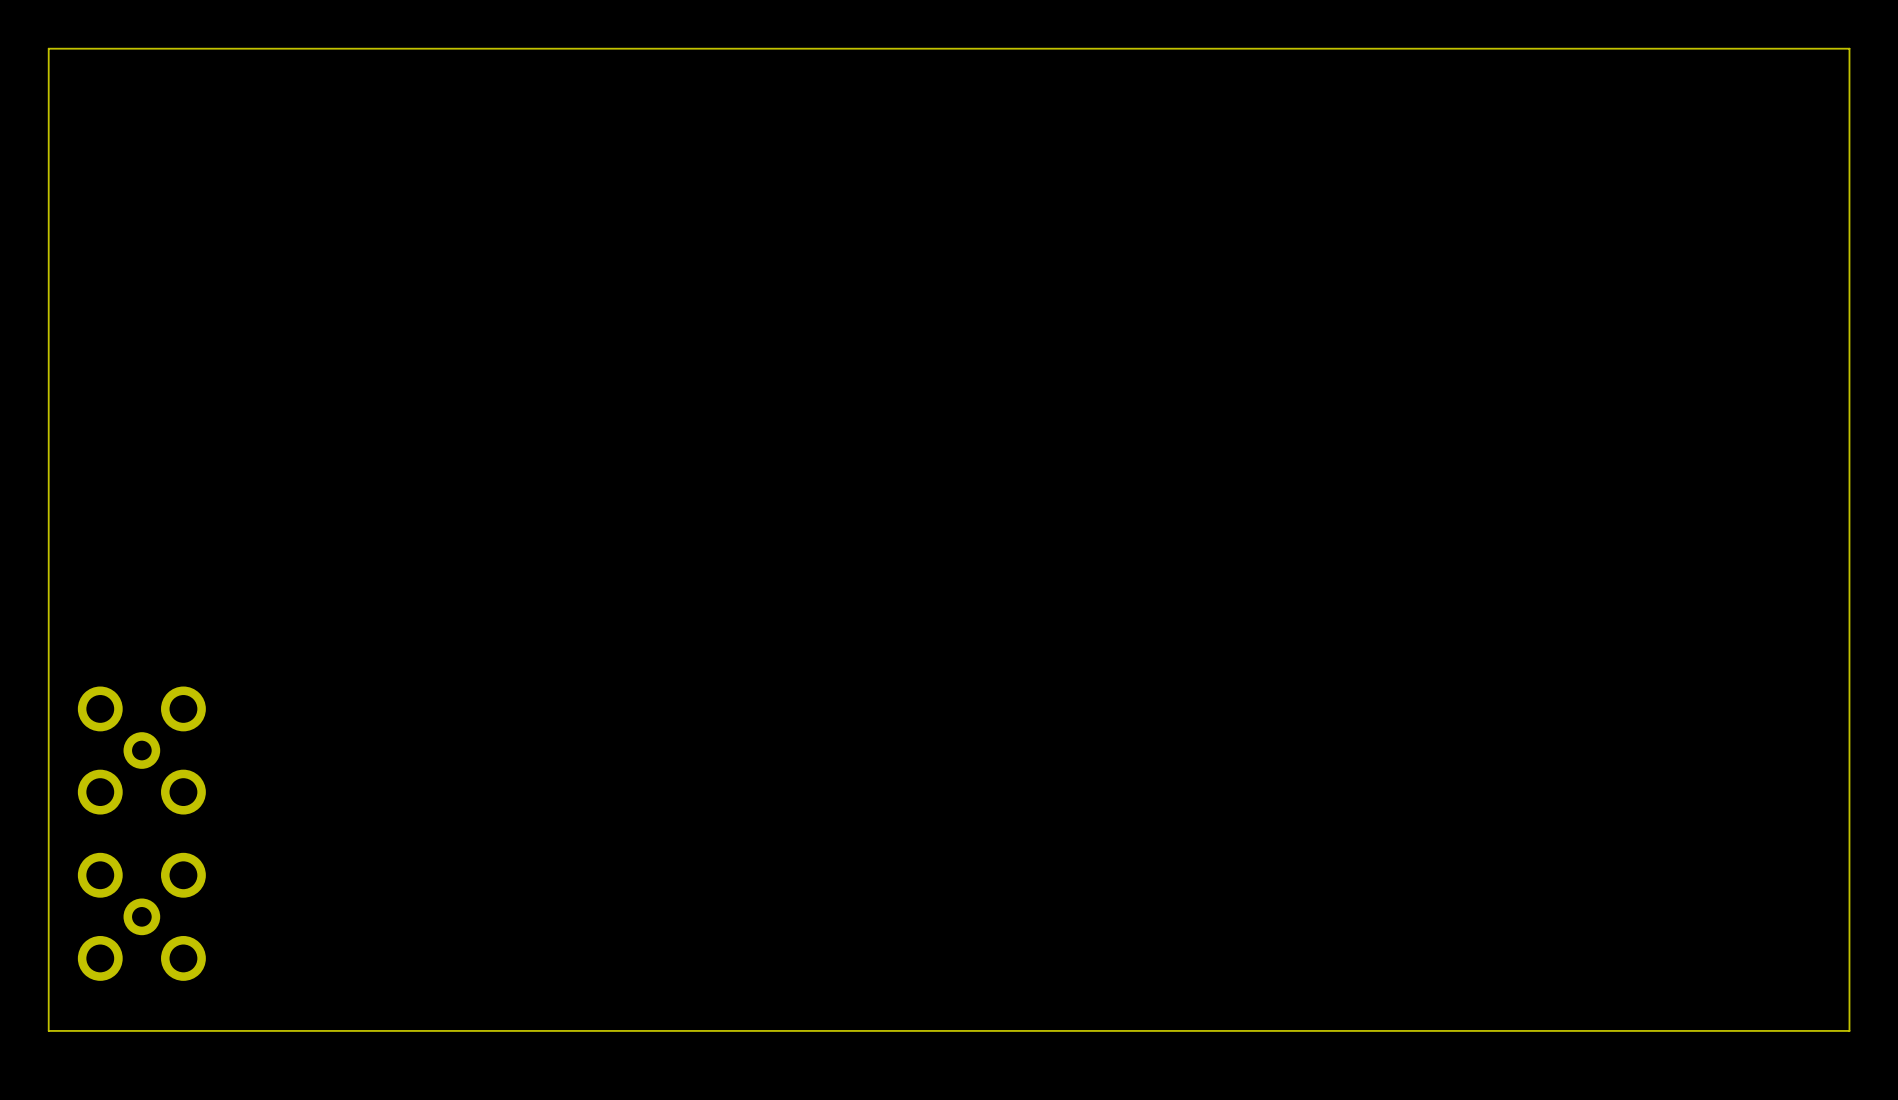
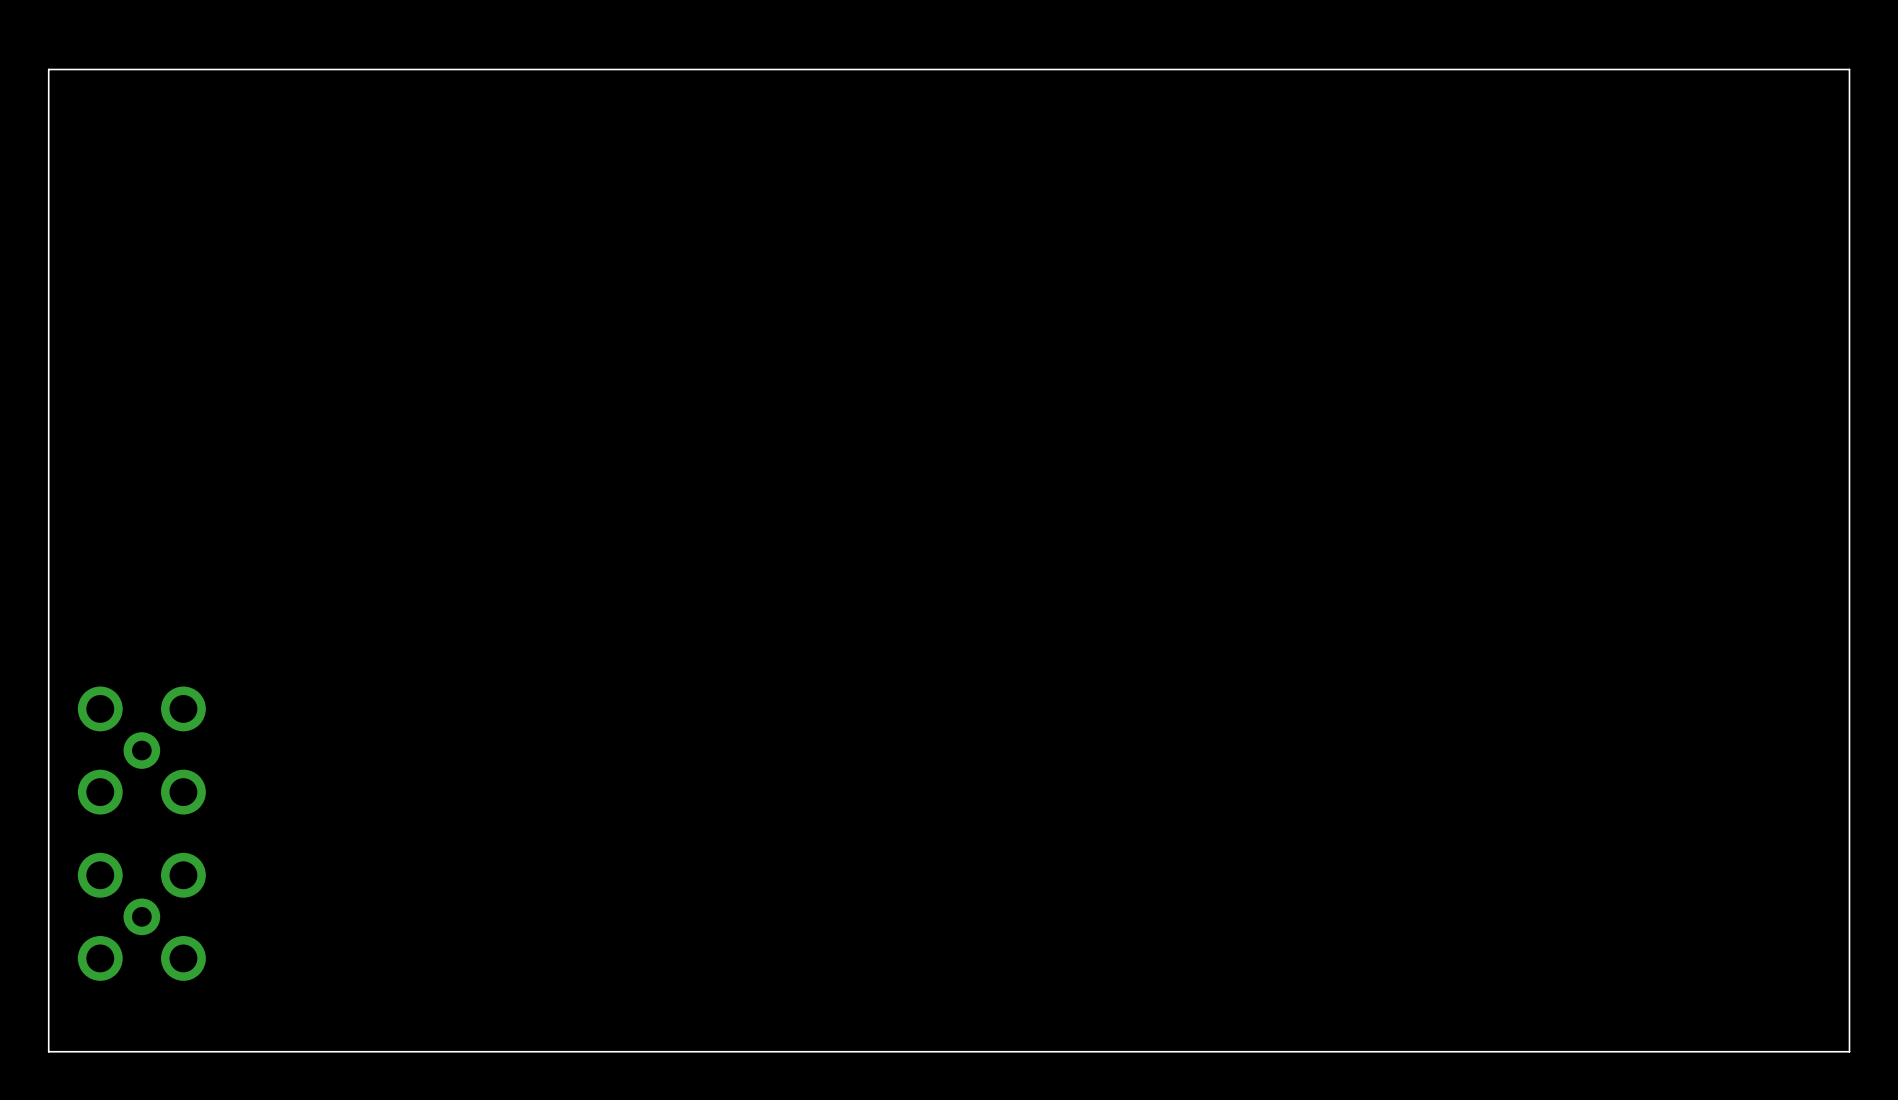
board edge: (1849, 69) (1849, 48) (48, 48) (48, 69) -> (1849, 69) (48, 69)
board edge: (1849, 1030) (48, 1030) -> (1849, 1030) (1849, 1051) (48, 1051) (48, 1030)

